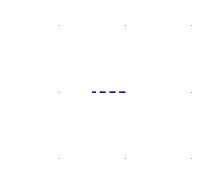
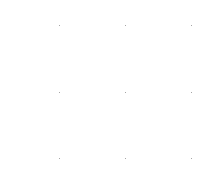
line: (92, 92) (125, 92) -> none

